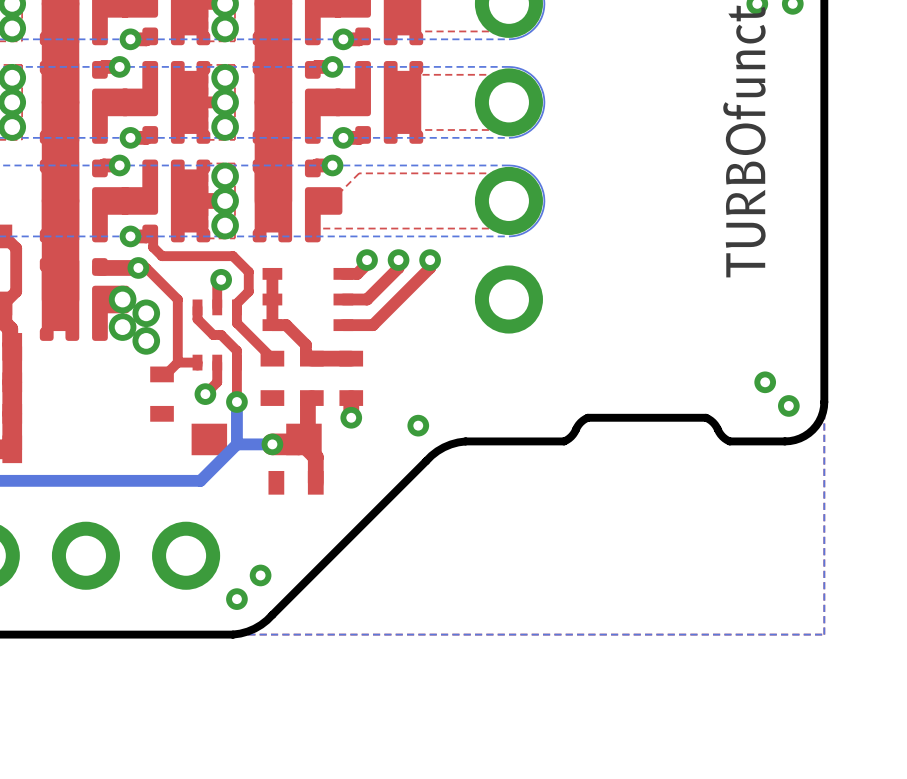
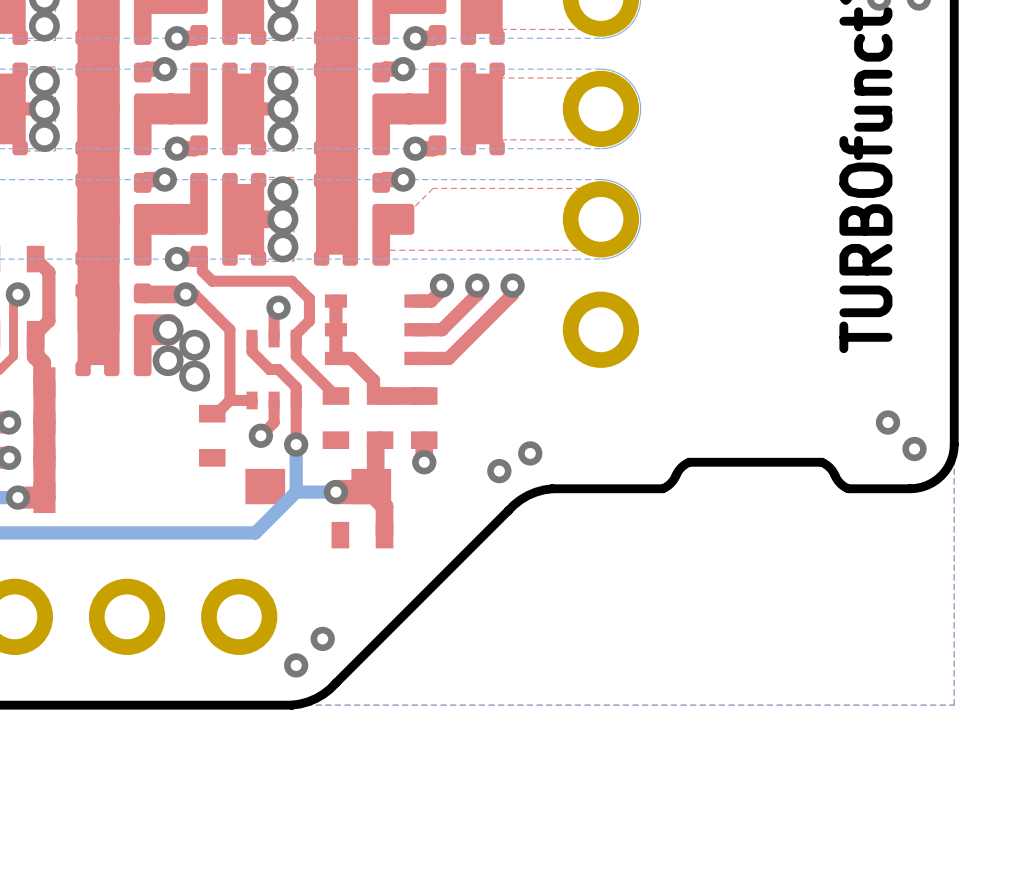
via: none -> (530, 453)

